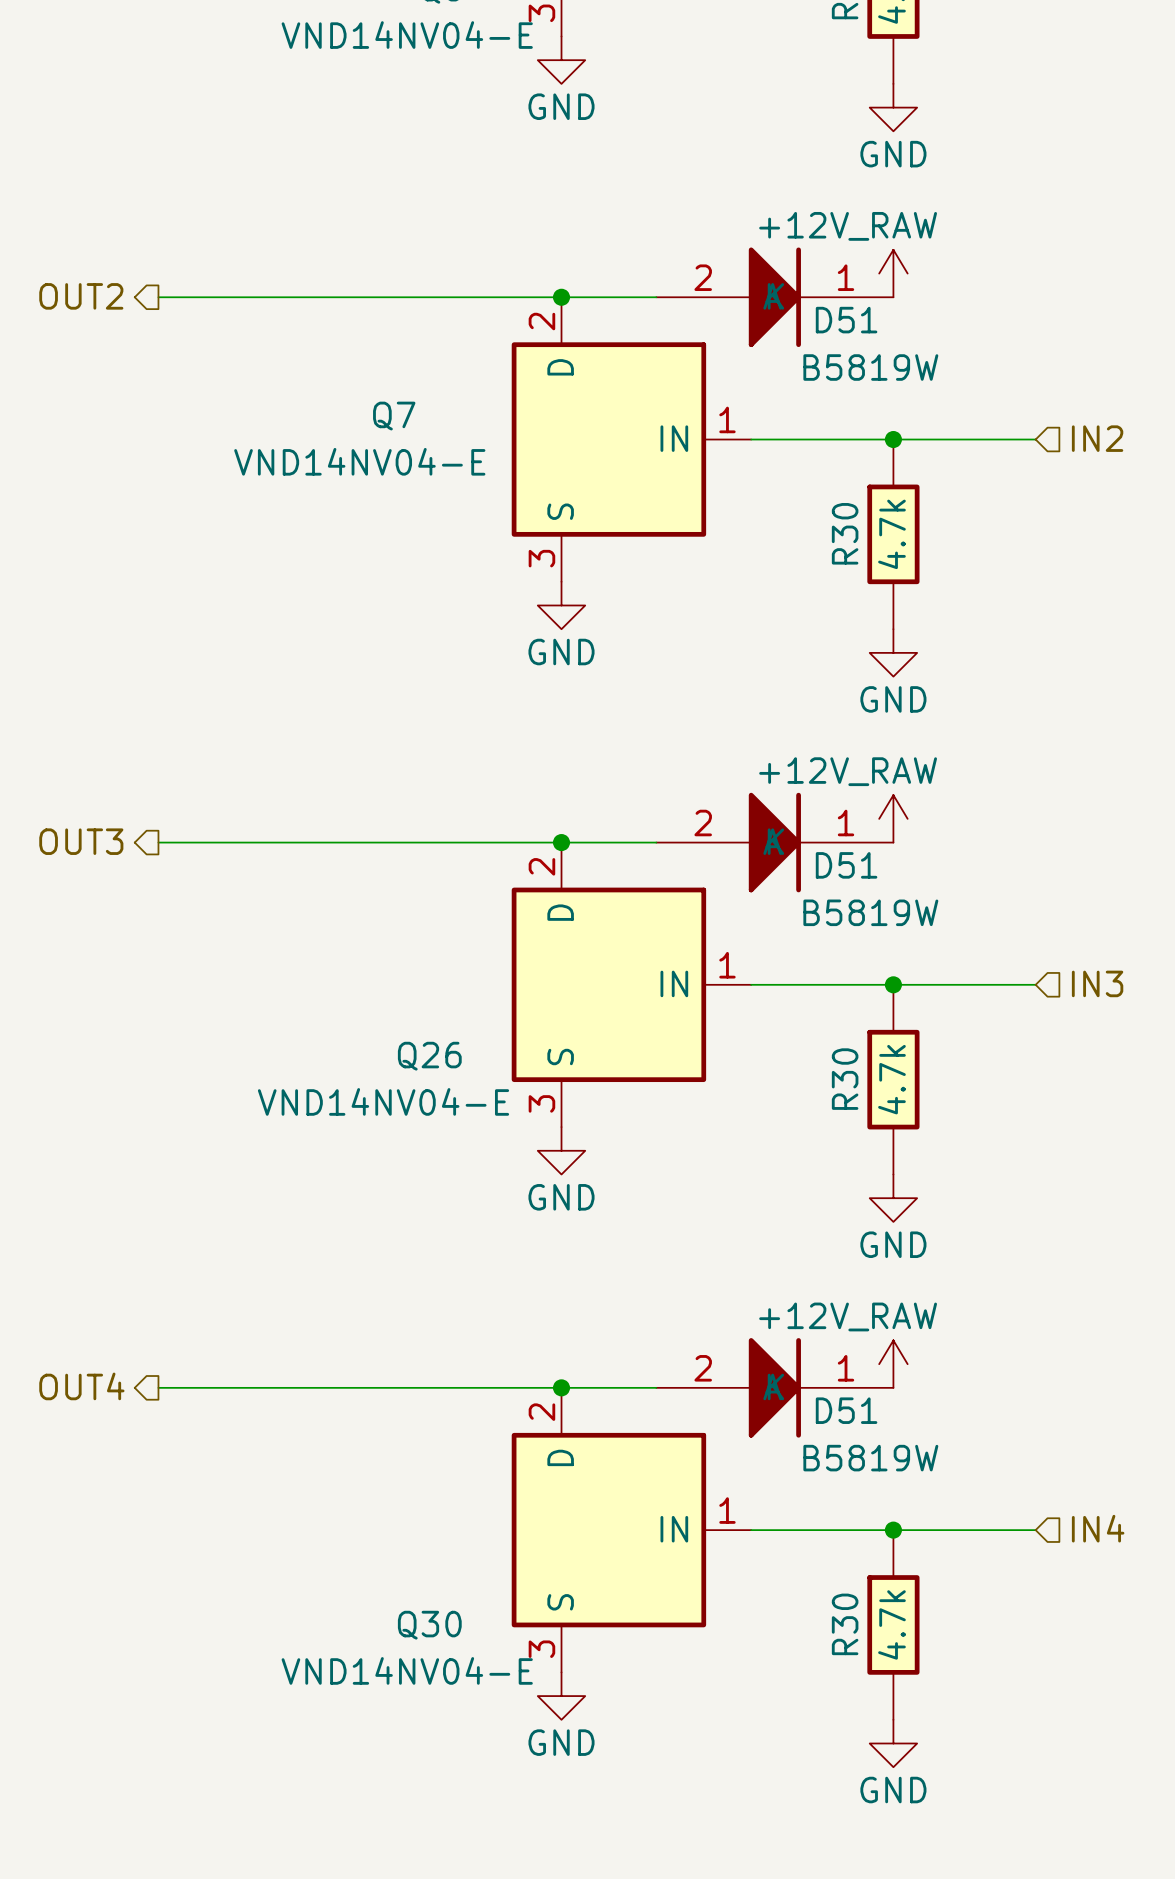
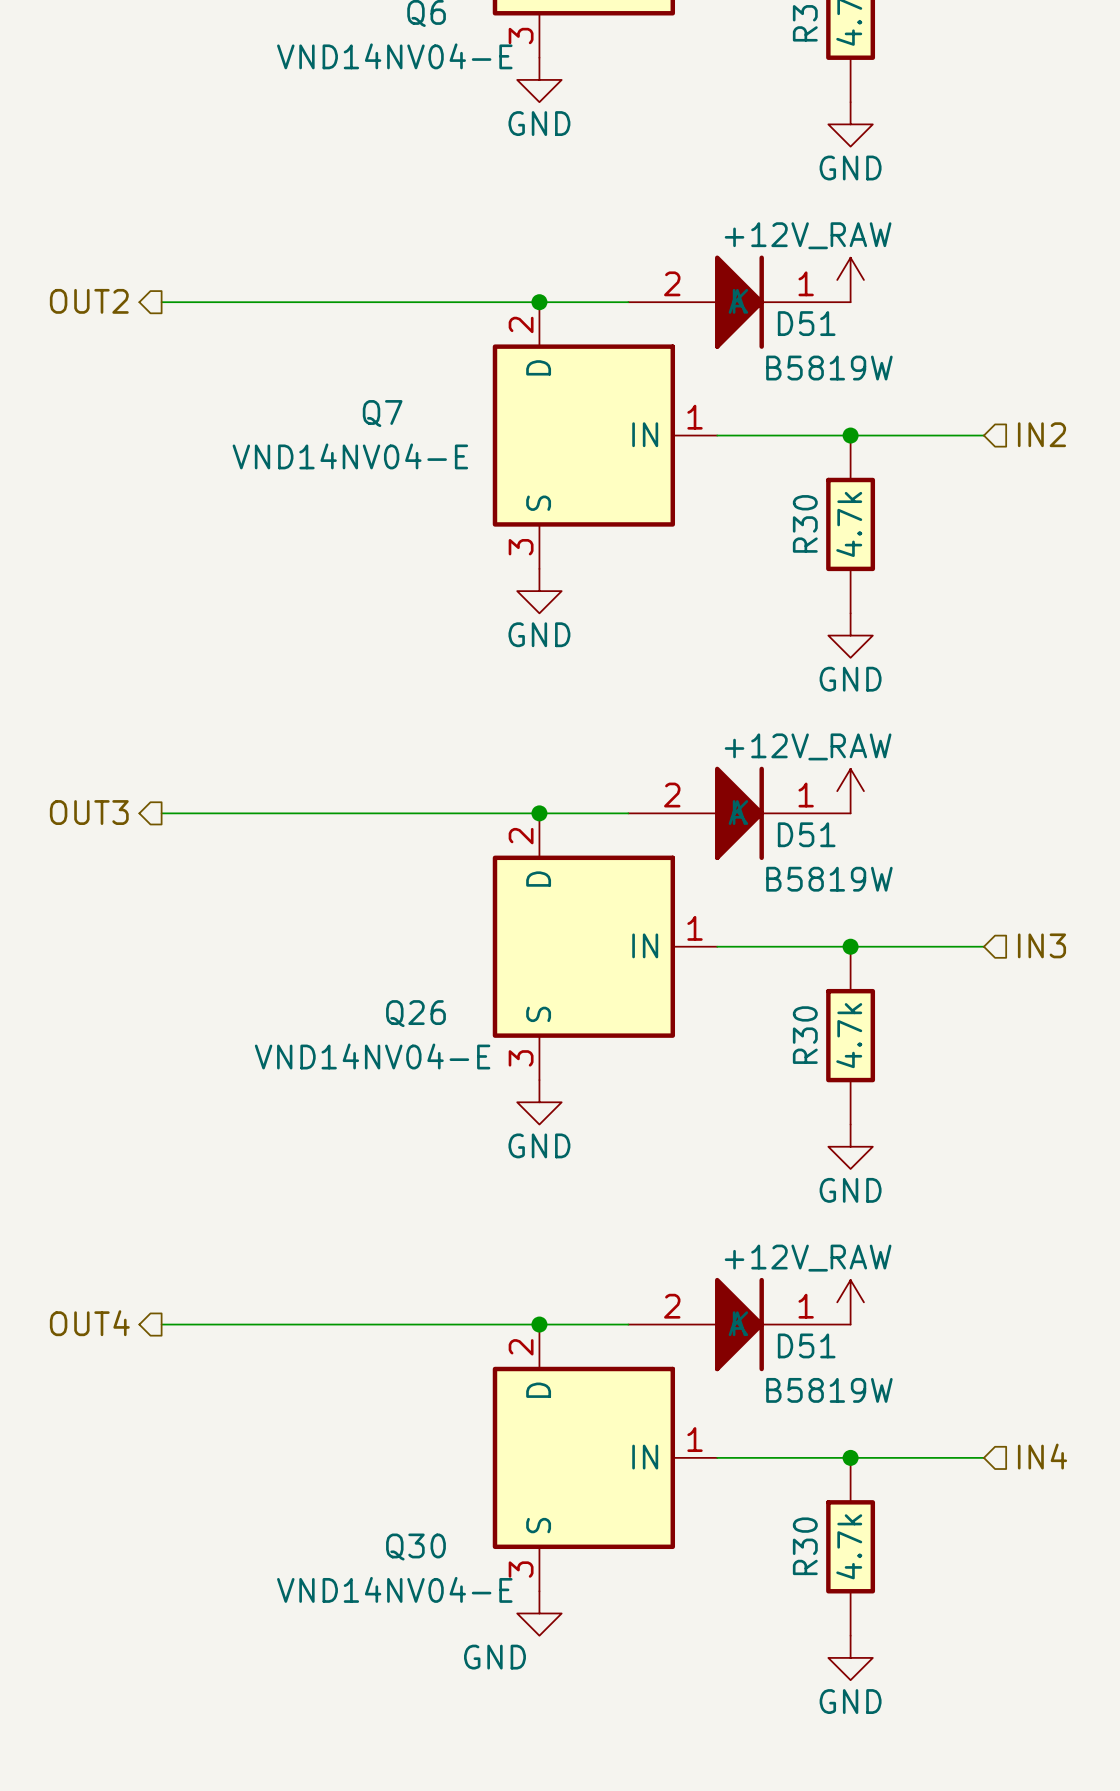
power symbol text position: GND (561, 1742) -> GND (494, 1657)

